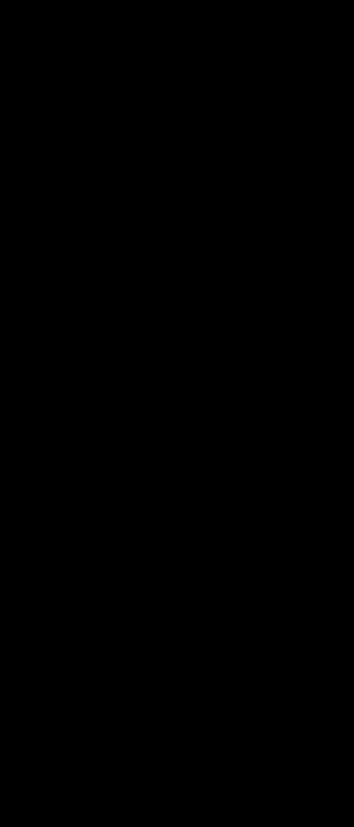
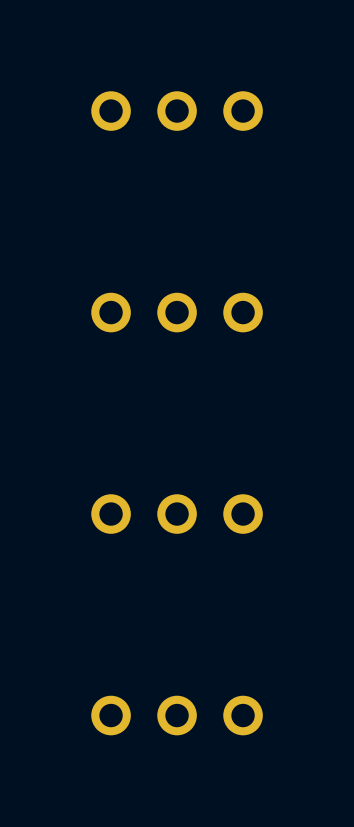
part: none -> (177, 111)
part: none -> (177, 312)
part: none -> (177, 514)
part: none -> (177, 715)

